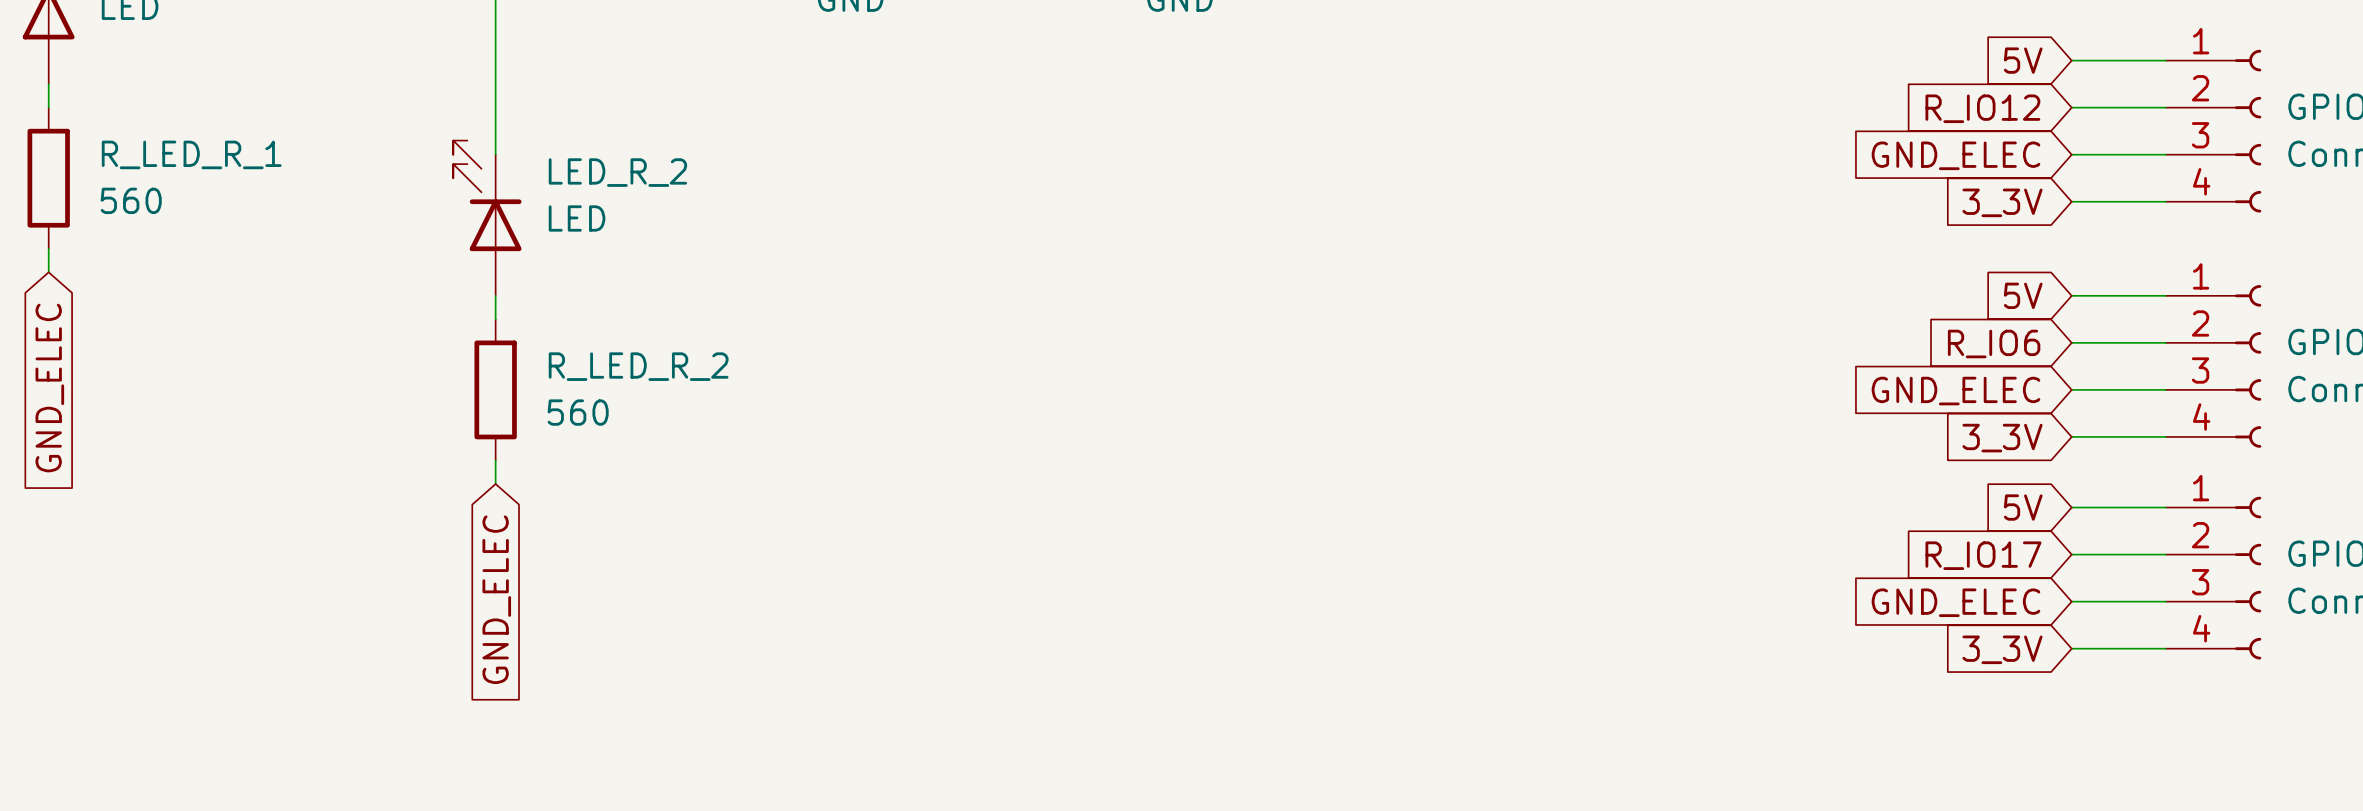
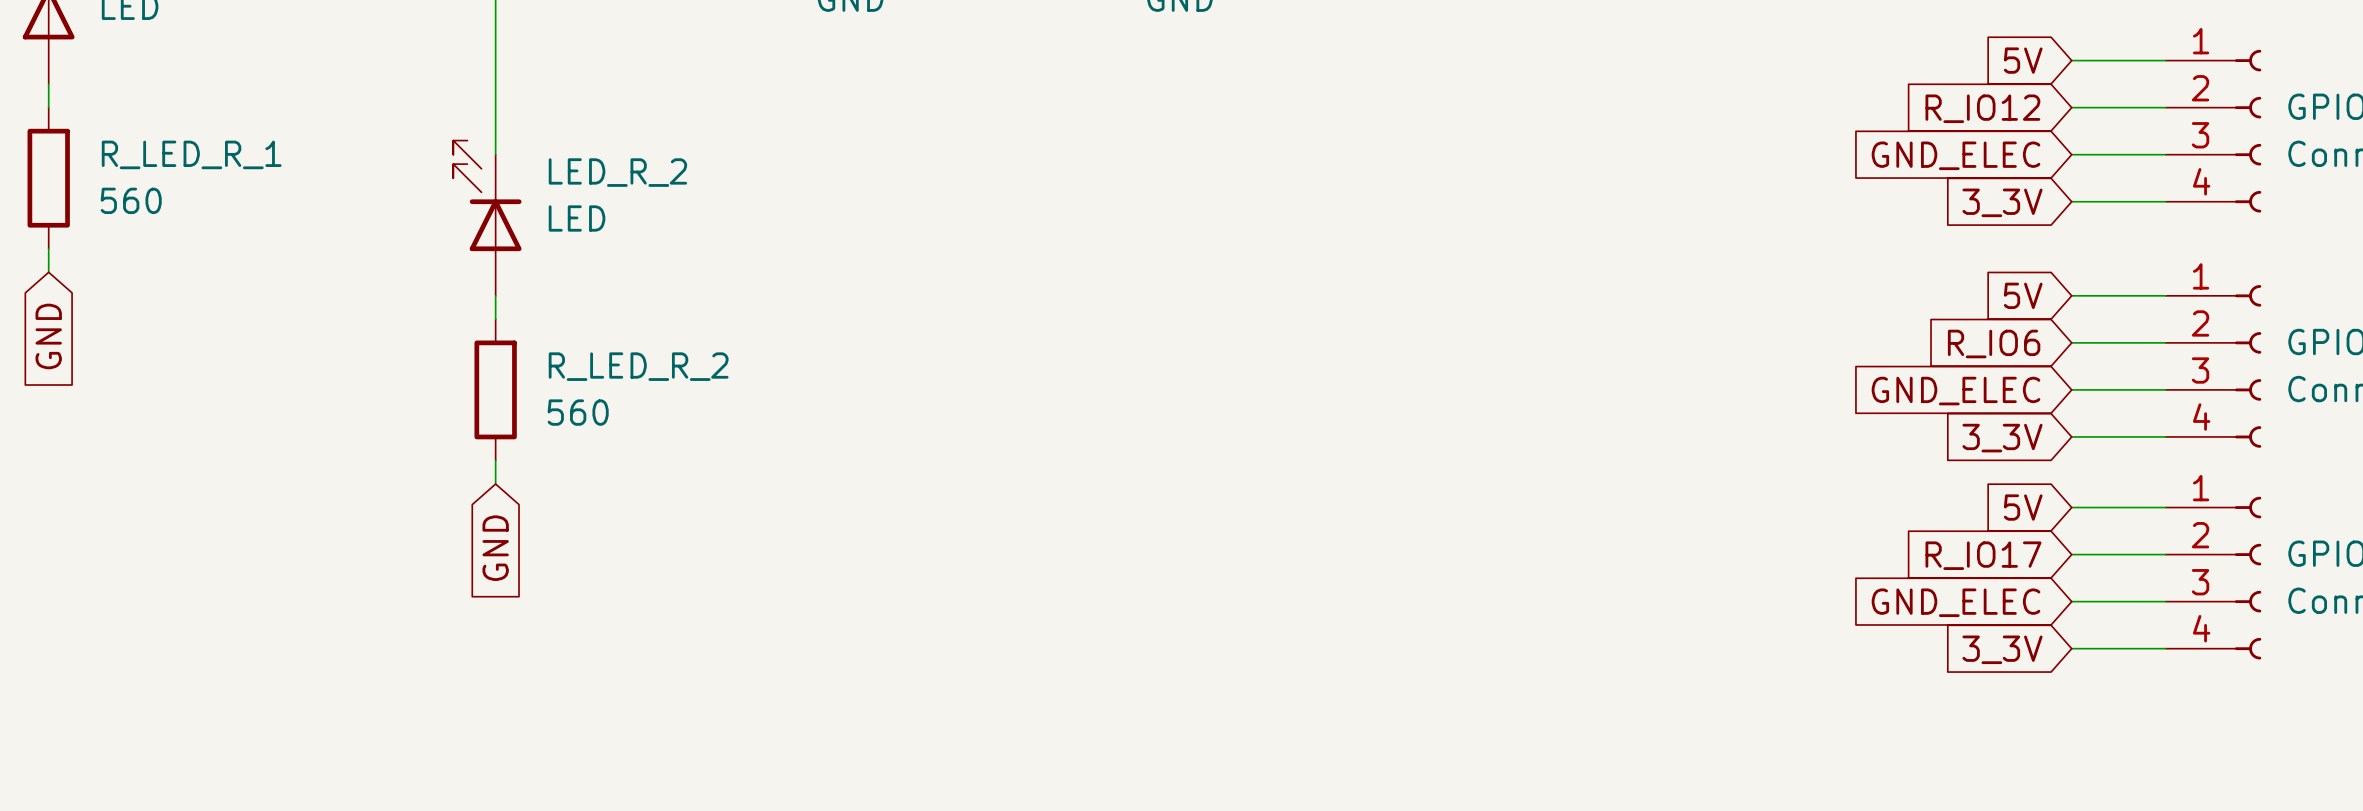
global label: GND_ELEC (49, 388) -> GND (48, 336)
global label: GND_ELEC (496, 599) -> GND (495, 548)

